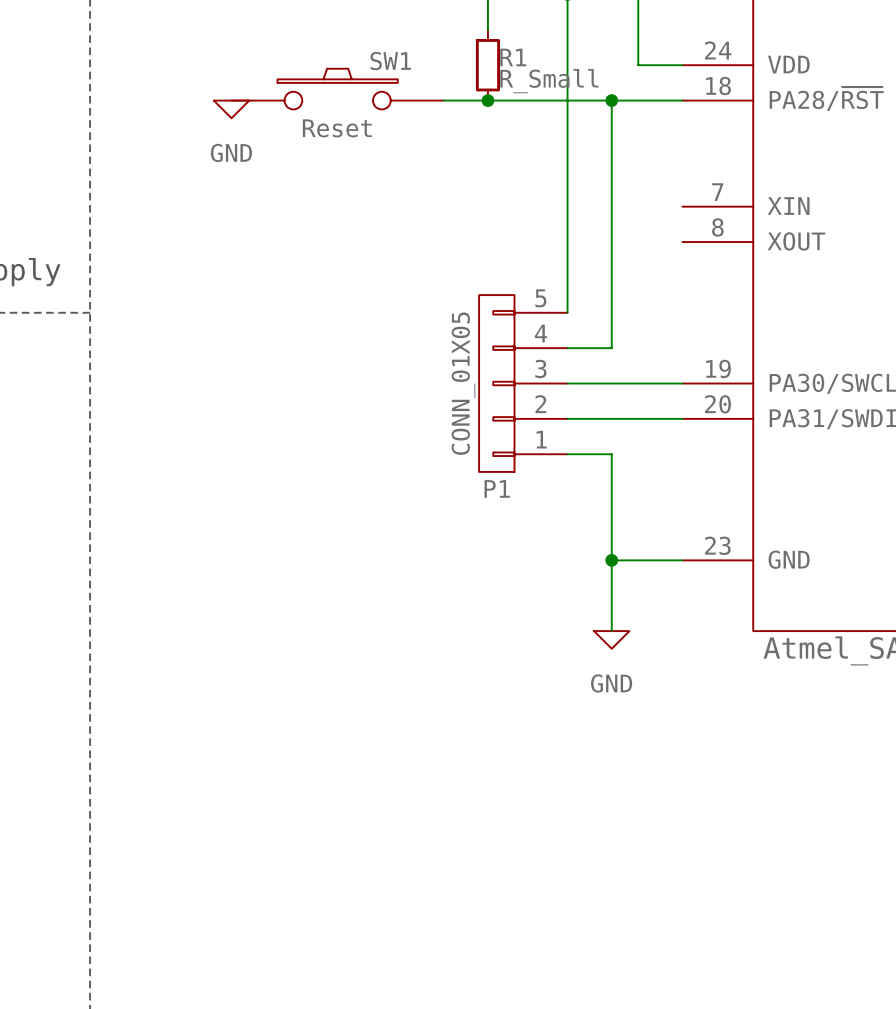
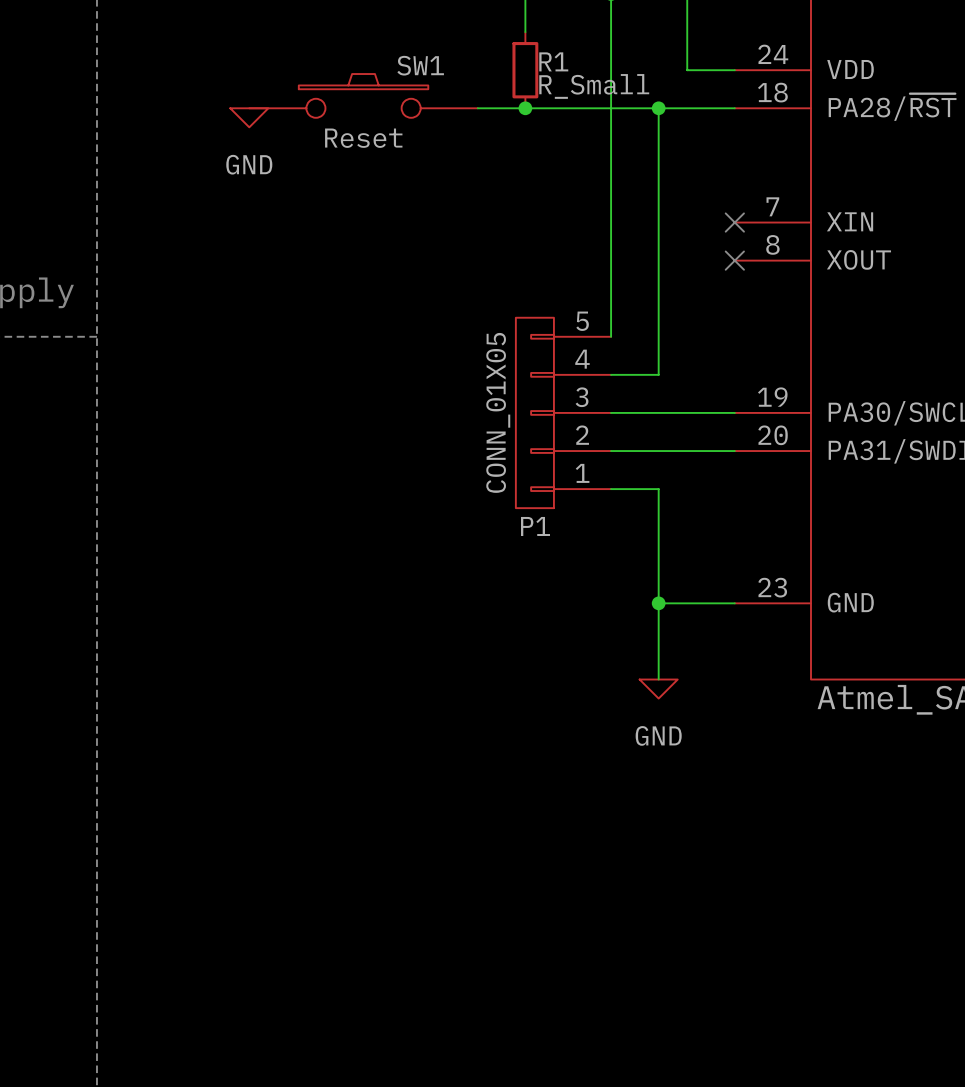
no-connect mark: none -> (734, 222)
no-connect mark: none -> (734, 260)

